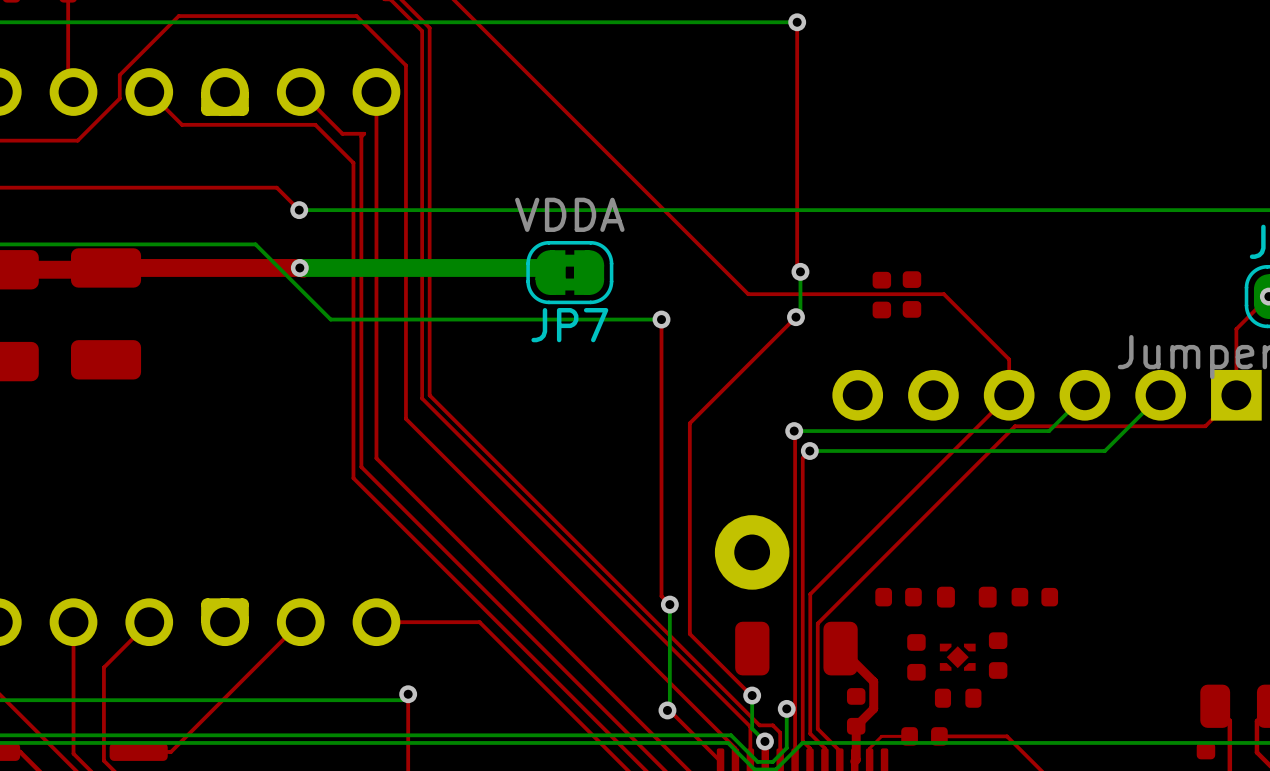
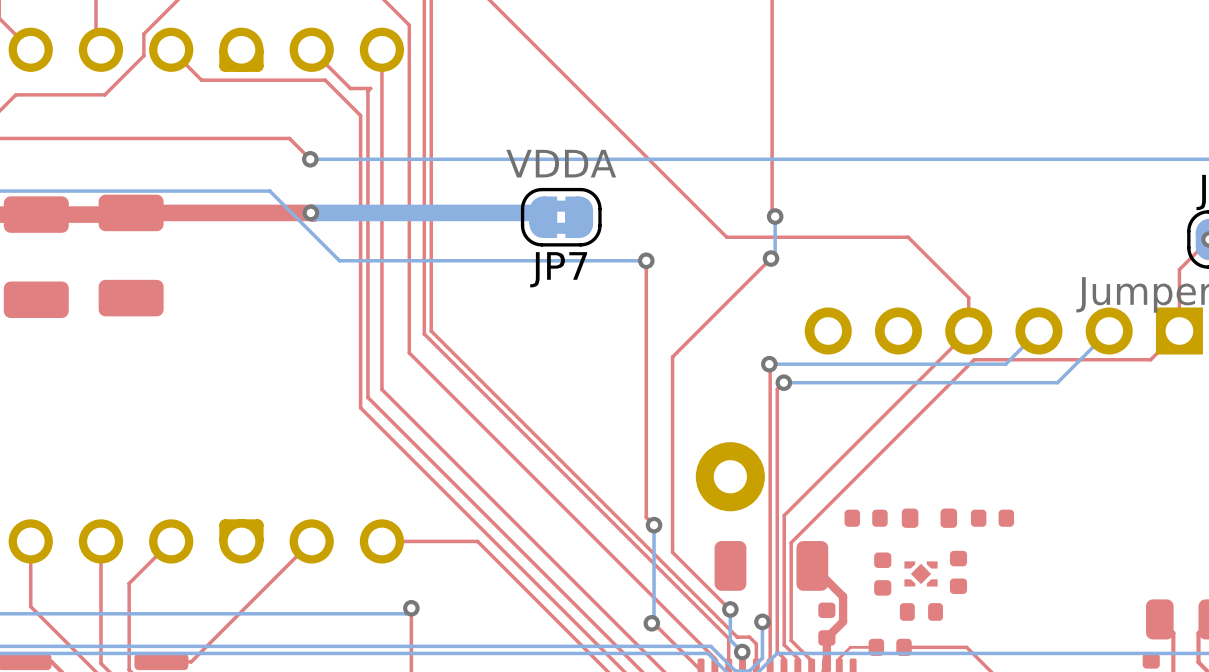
part: (911, 294) -> none
part: (881, 295) -> none

